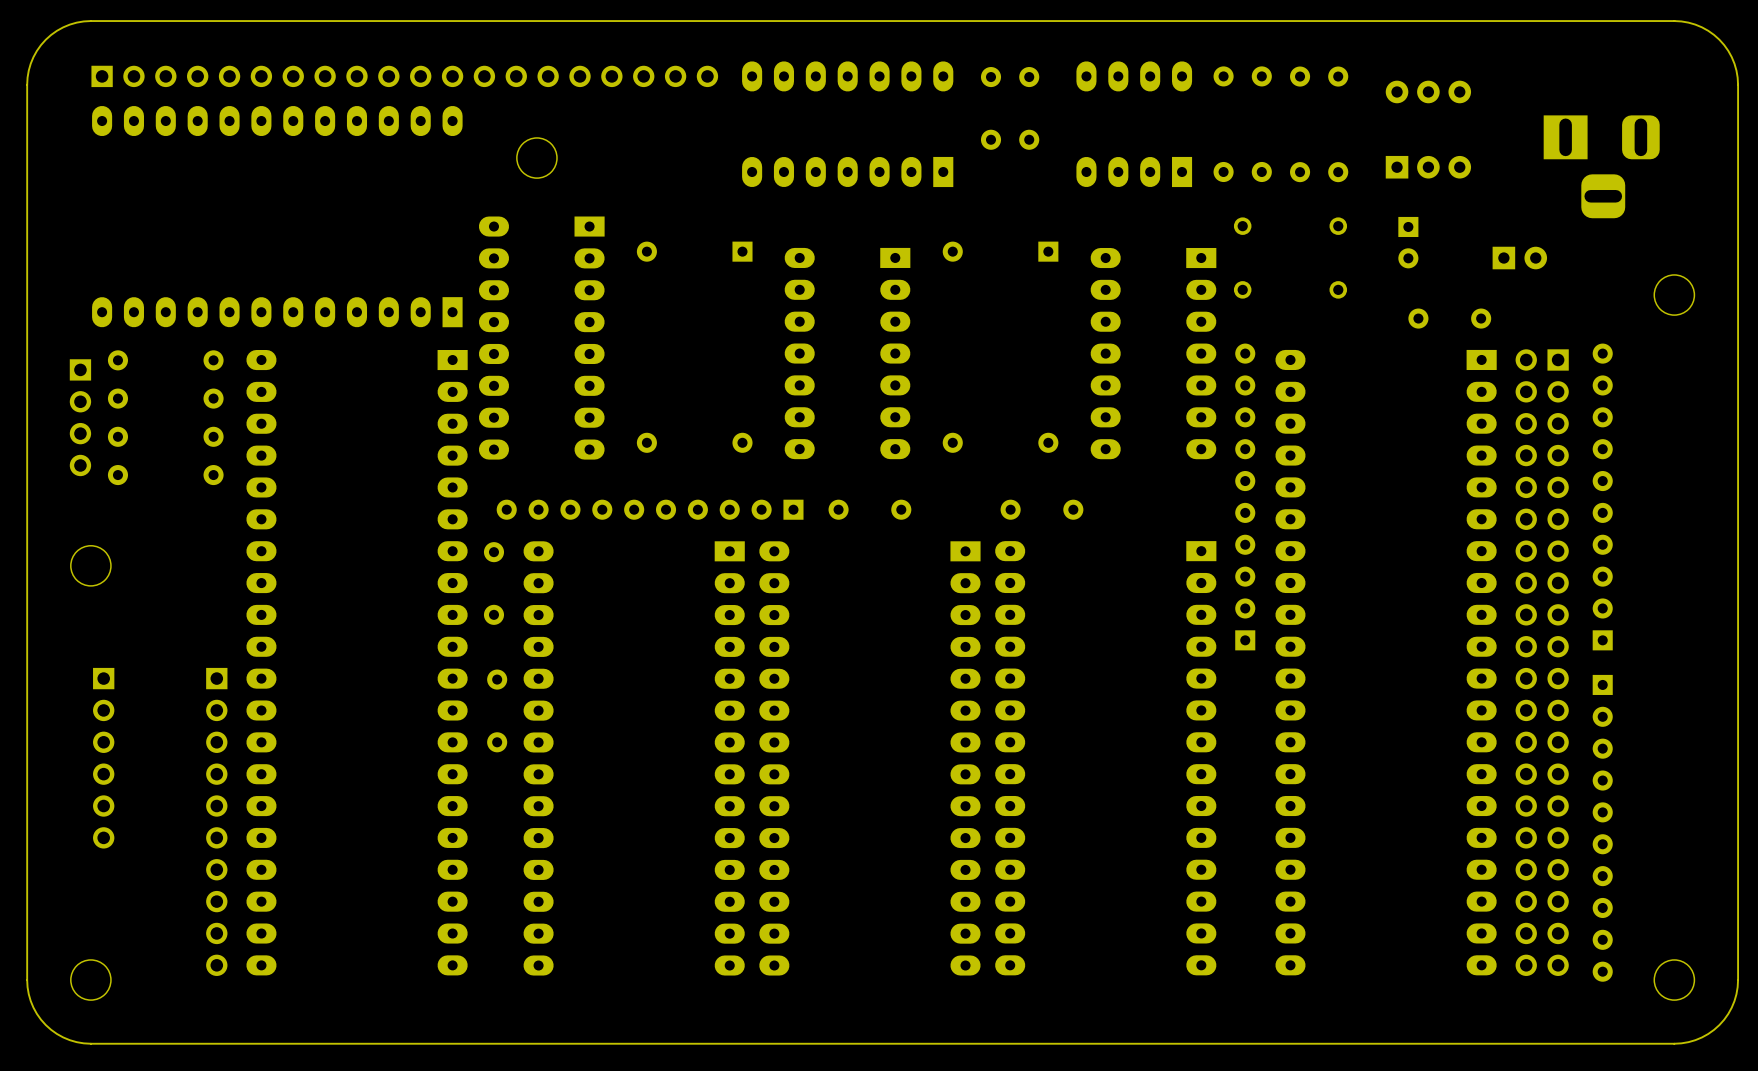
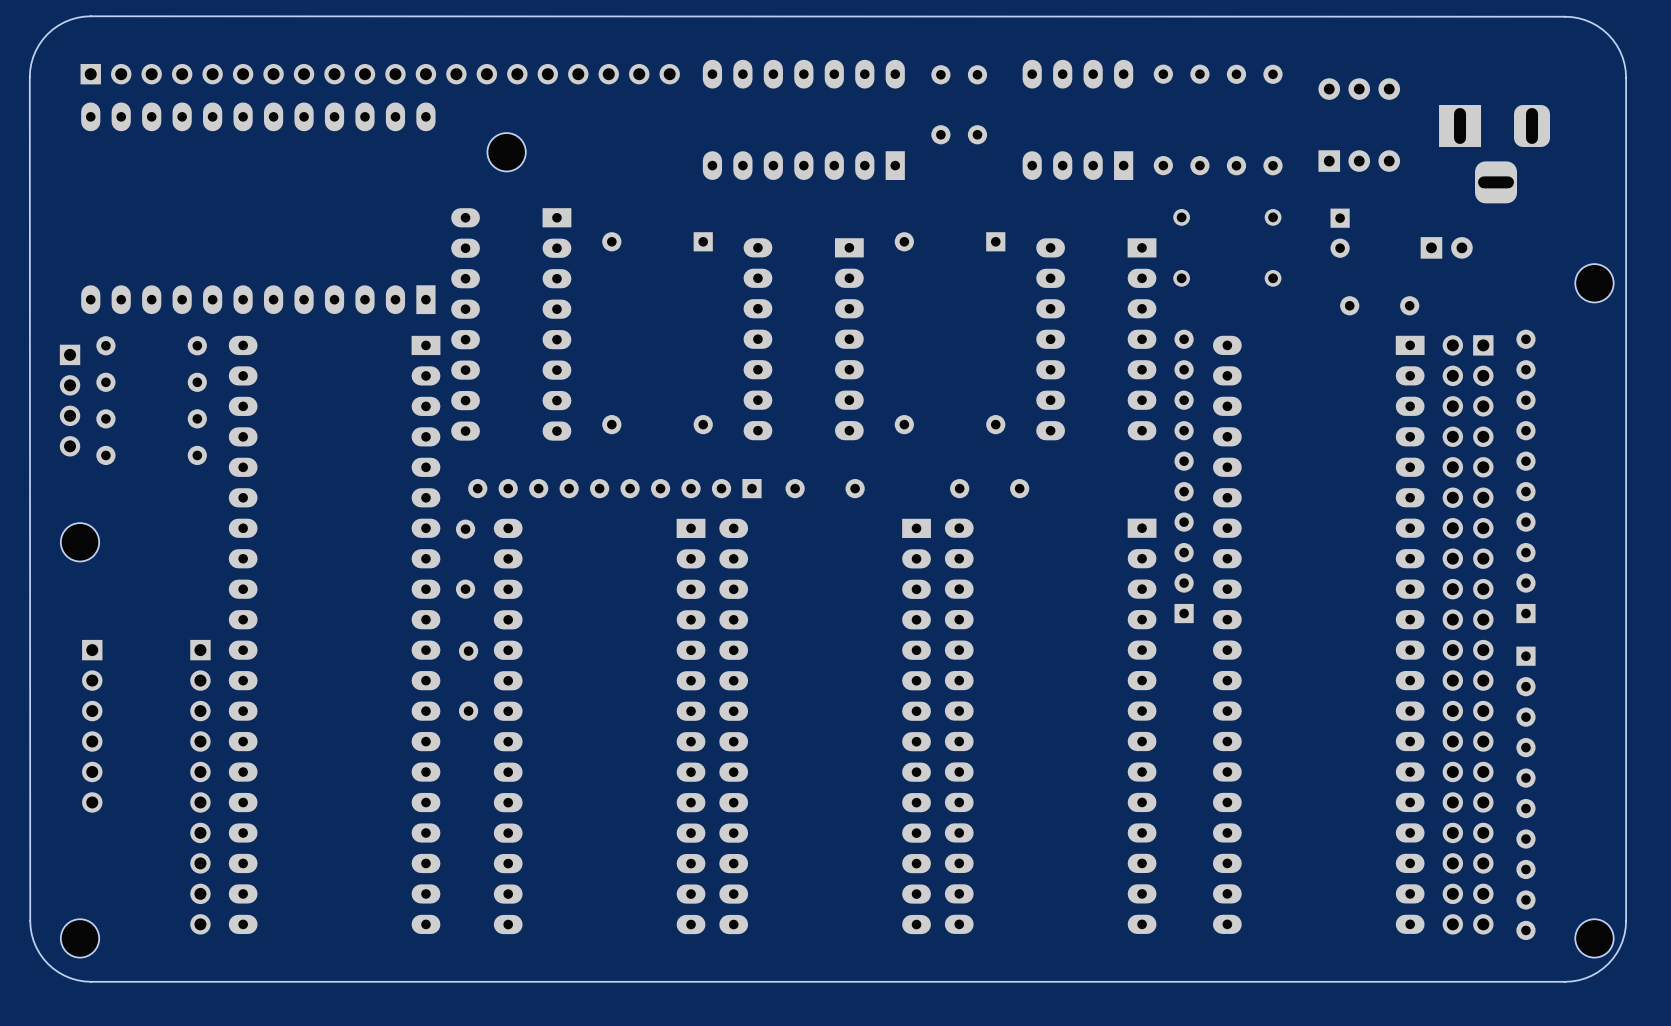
board edge: (1674, 21) (90, 21) (76, 22) (56, 30) (45, 39) (36, 50) (28, 70) (27, 84) (27, 980) (28, 994) (36, 1013) (45, 1025) (56, 1033) (76, 1042) (90, 1043) (1674, 1043) (1688, 1042) (1708, 1033) (1719, 1025) (1728, 1013) (1736, 994) (1738, 980) (1738, 84) (1736, 70) (1731, 57) (1719, 39) (1701, 27) (1688, 22) (1674, 21) -> (90, 16) (1565, 16) (1585, 20) (1597, 26) (1608, 34) (1616, 45) (1624, 64) (1626, 77) (1626, 920) (1622, 941) (1616, 953) (1603, 968) (1591, 975) (1578, 980) (1565, 981) (91, 981) (77, 980) (58, 972) (43, 958) (36, 947) (31, 934) (30, 920) (29, 77) (33, 57) (39, 44) (47, 34) (64, 22) (77, 17) (90, 16)
part position: (1601, 166) -> (1494, 154)

